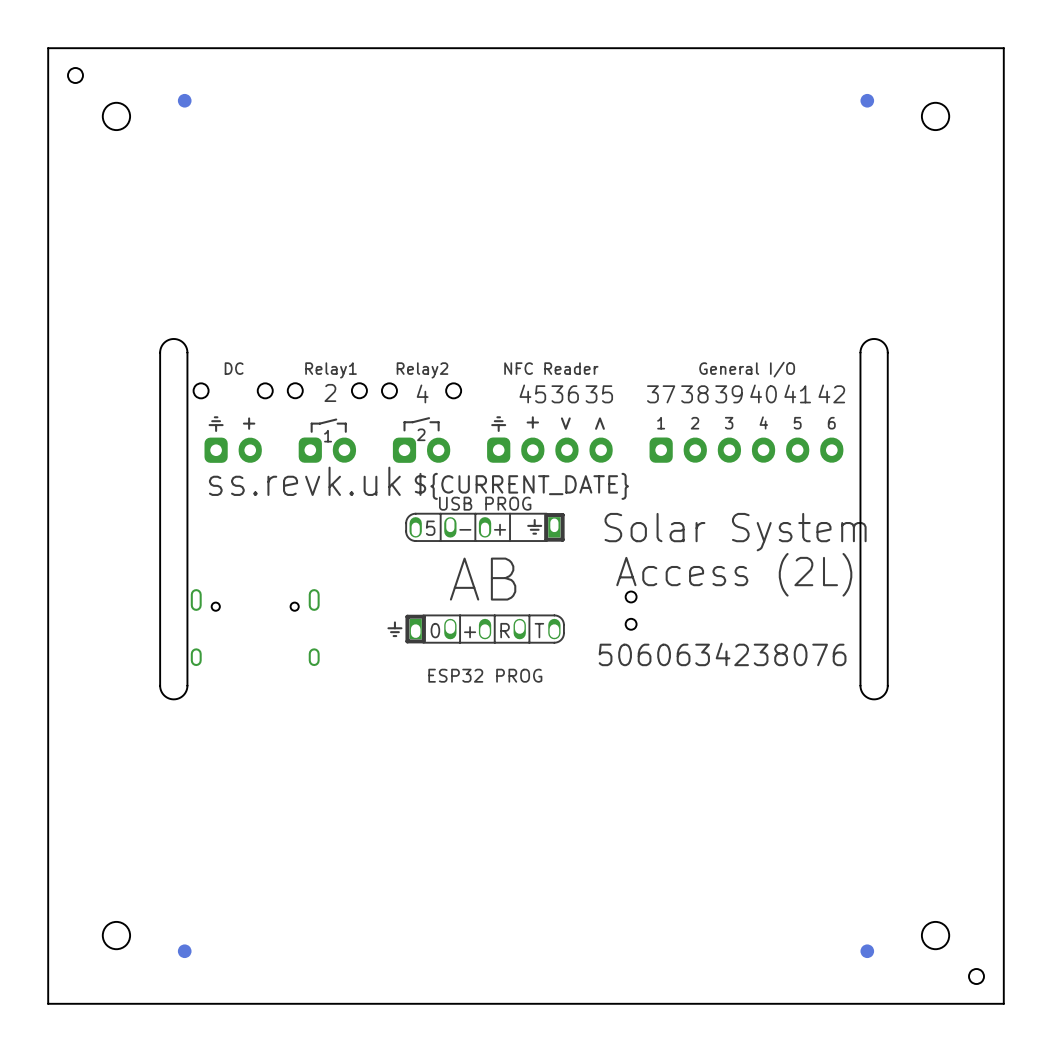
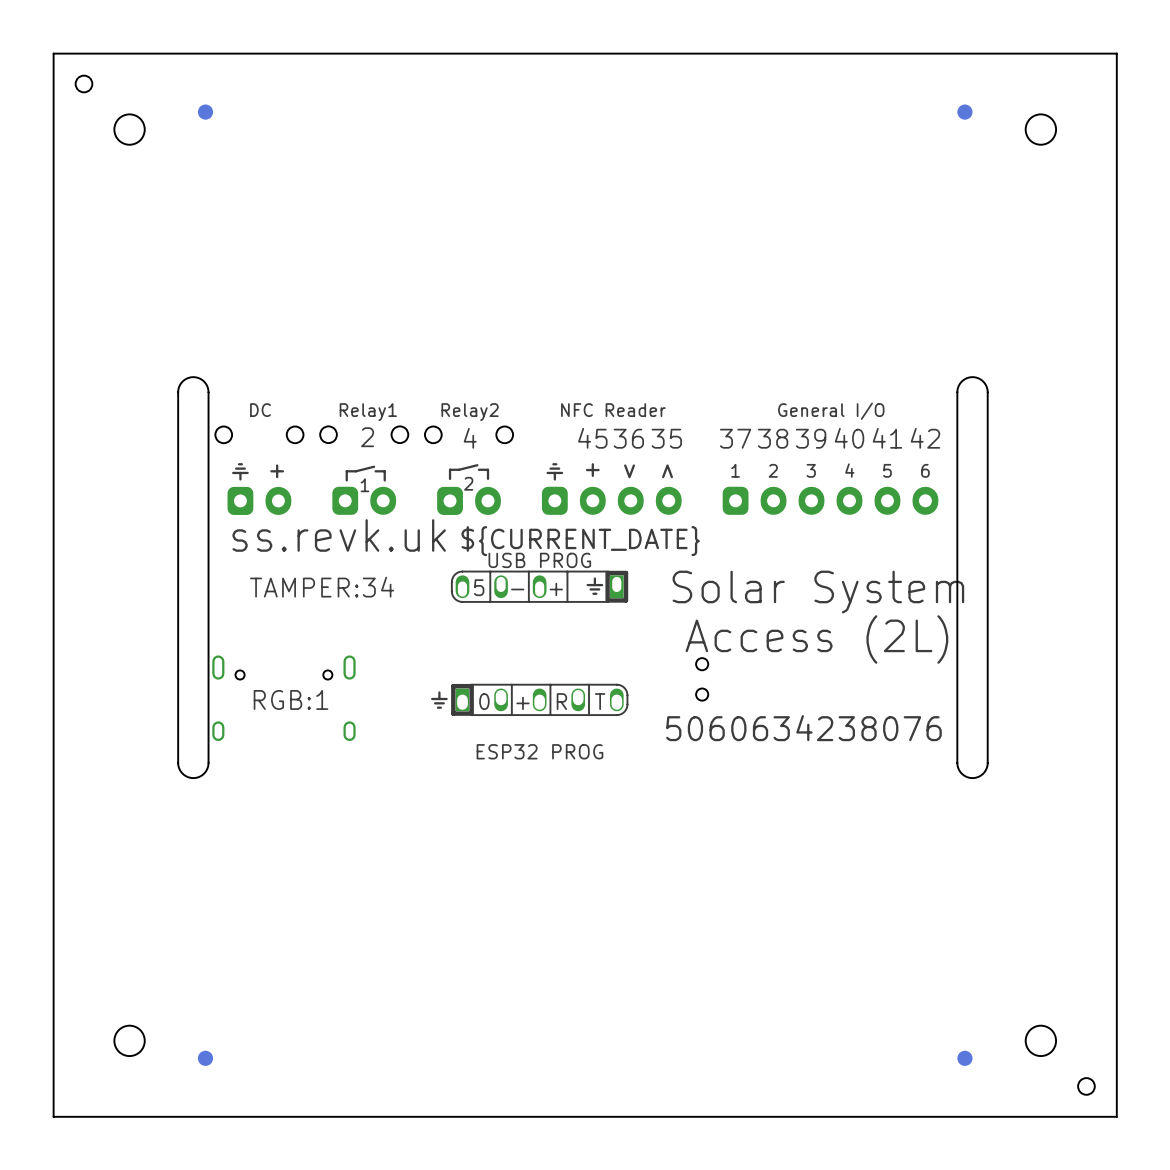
text: none -> TAMPER:34 (322, 587)
text: AB (483, 579) -> none
text: none -> RGB:1 (290, 699)

